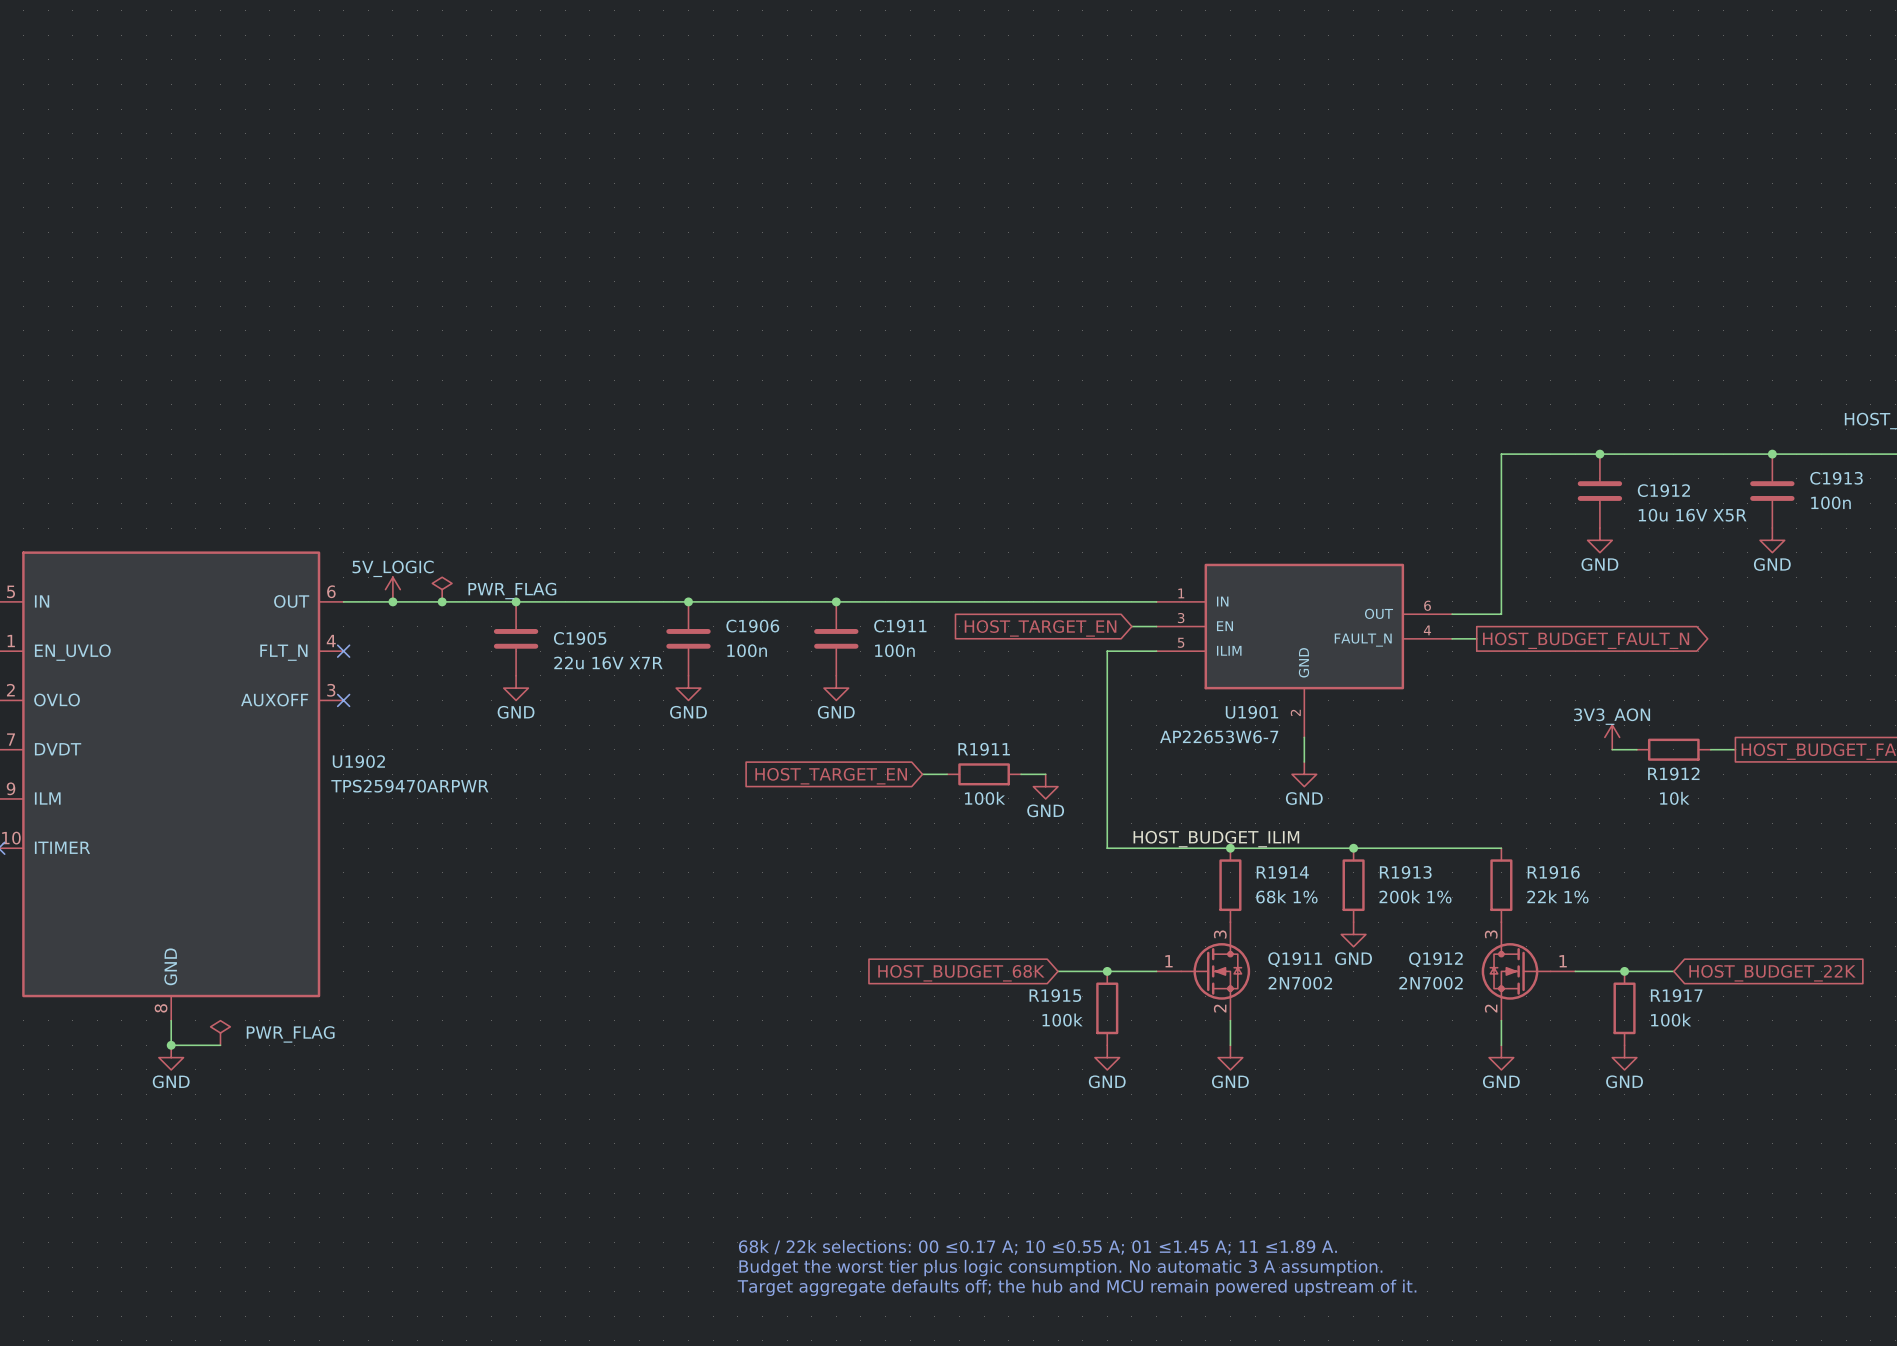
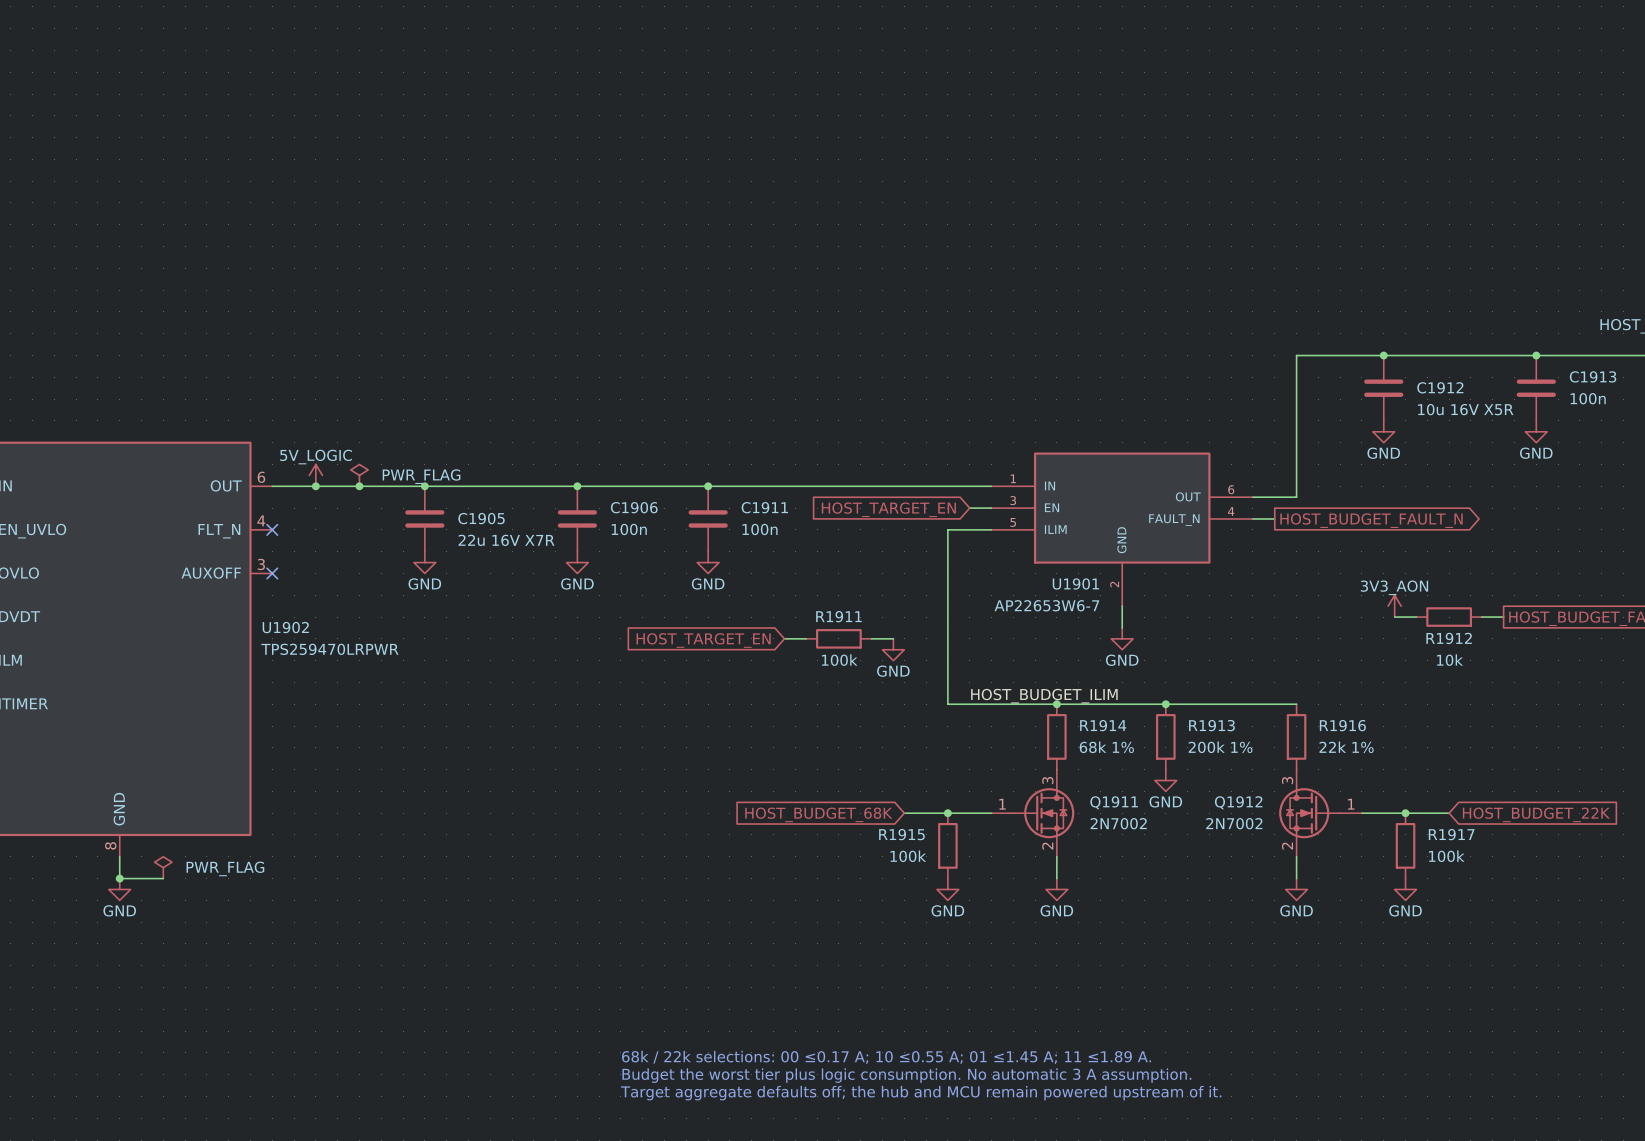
U1902 value: TPS259470ARPWR (409, 786) -> TPS259470LRPWR (329, 649)

